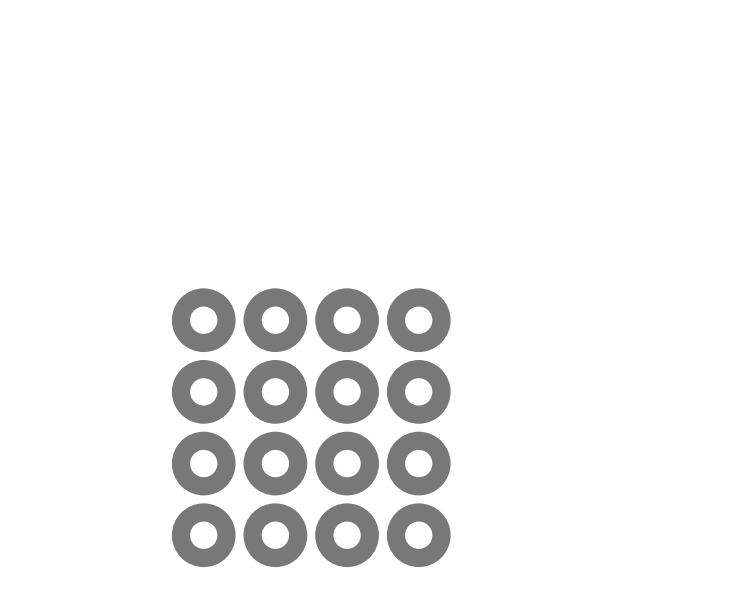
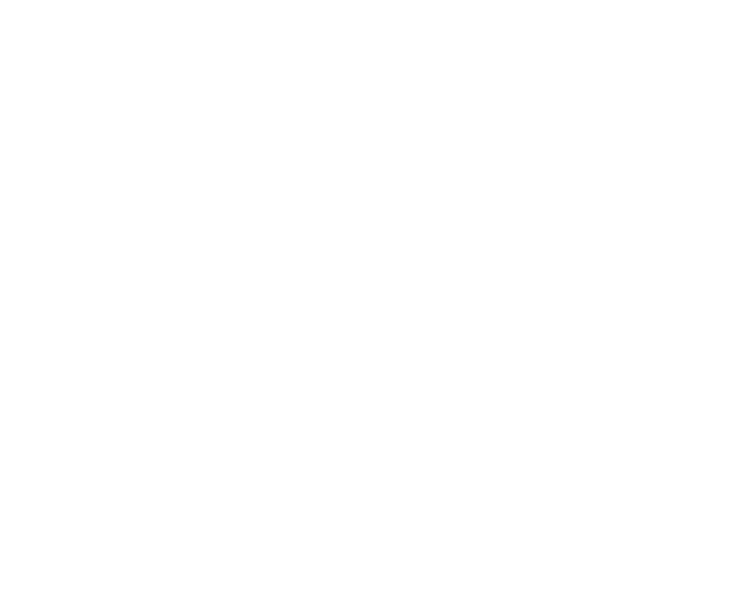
via: (203, 320) -> none
via: (275, 320) -> none
via: (347, 320) -> none
via: (418, 320) -> none
via: (203, 391) -> none
via: (275, 391) -> none
via: (347, 391) -> none
via: (418, 391) -> none
via: (203, 463) -> none
via: (275, 463) -> none
via: (347, 463) -> none
via: (418, 463) -> none
via: (203, 535) -> none
via: (275, 535) -> none
via: (347, 535) -> none
via: (418, 535) -> none

